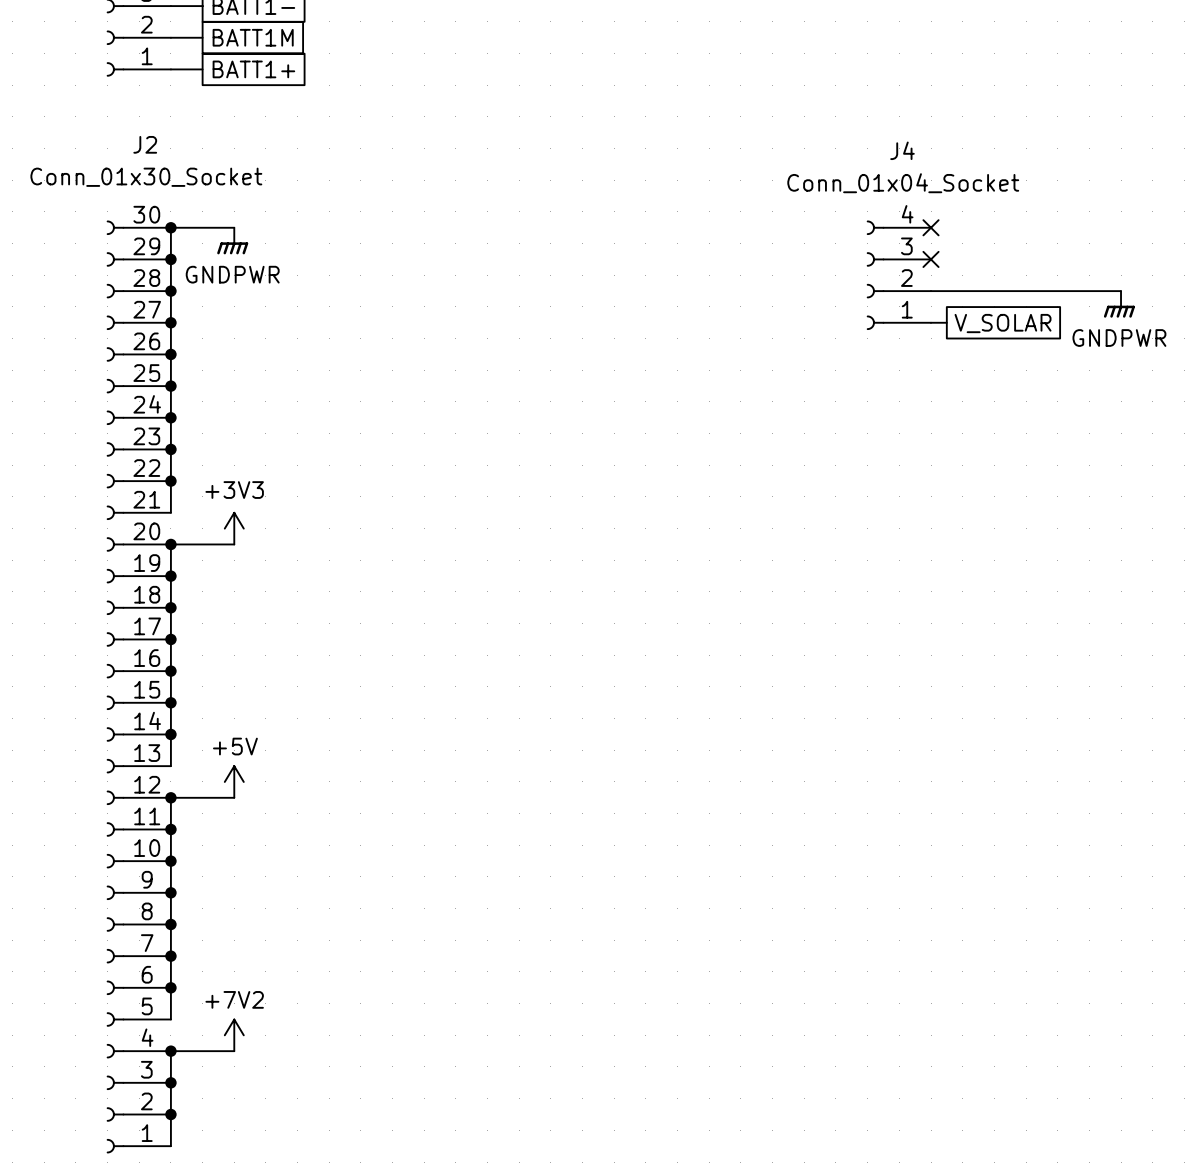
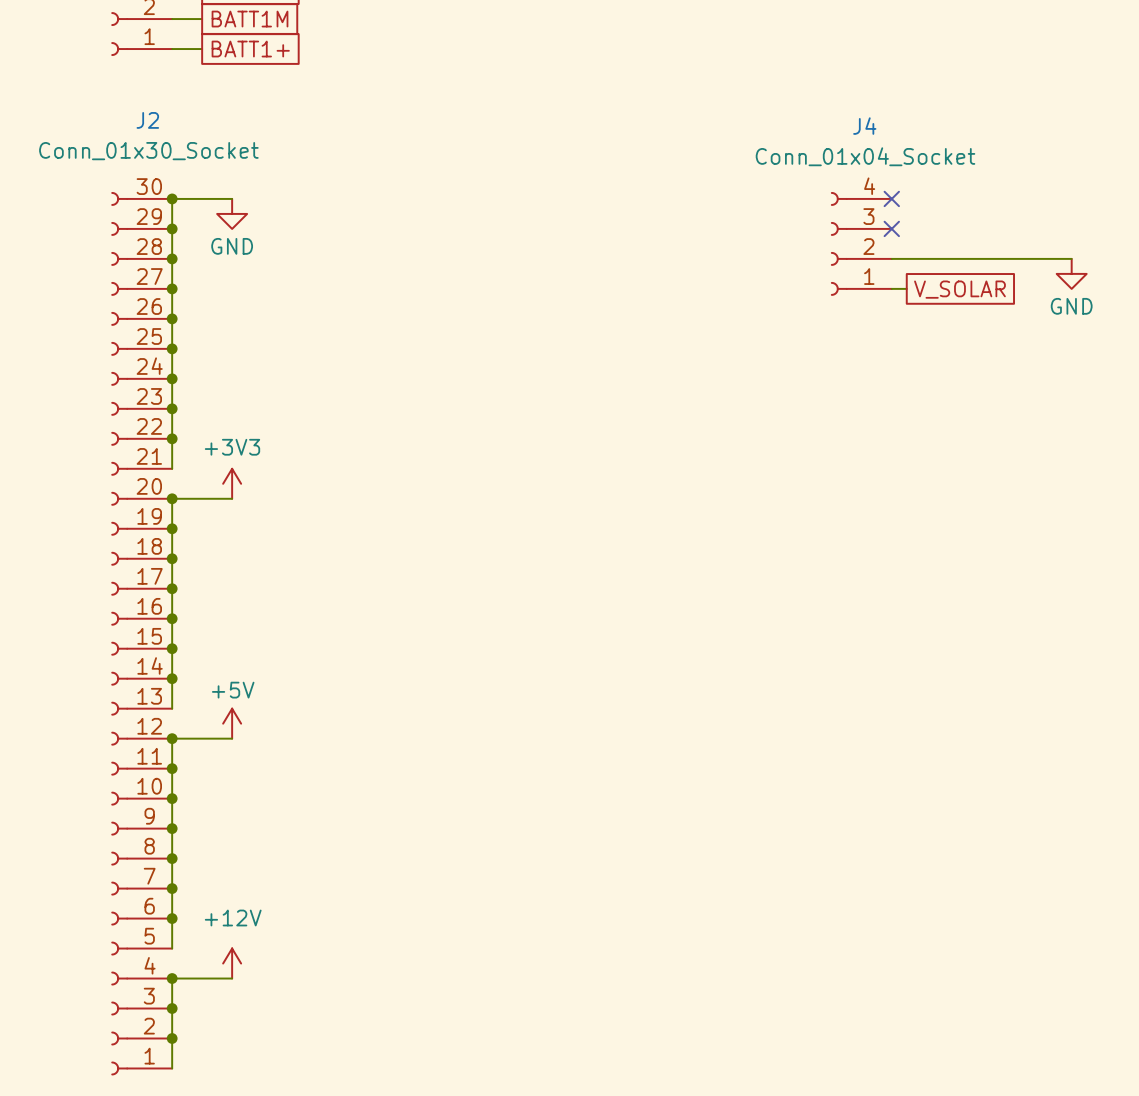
power symbol: GNDPWR (232, 241) -> GND (232, 213)
power symbol: GNDPWR (1119, 304) -> GND (1071, 273)
power symbol: +7V2 (234, 1035) -> +12V (232, 963)

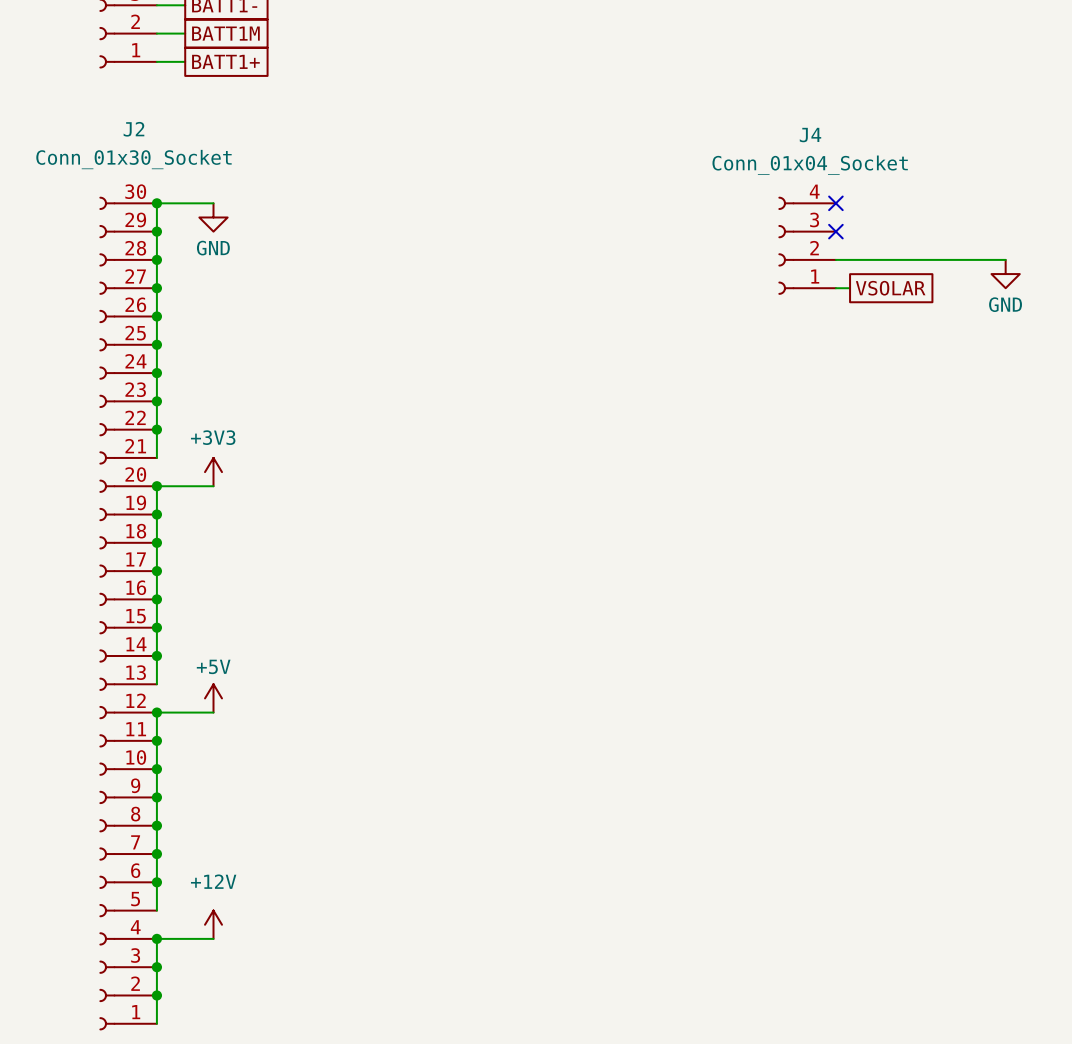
global label: V_SOLAR (959, 289) -> VSOLAR (890, 288)

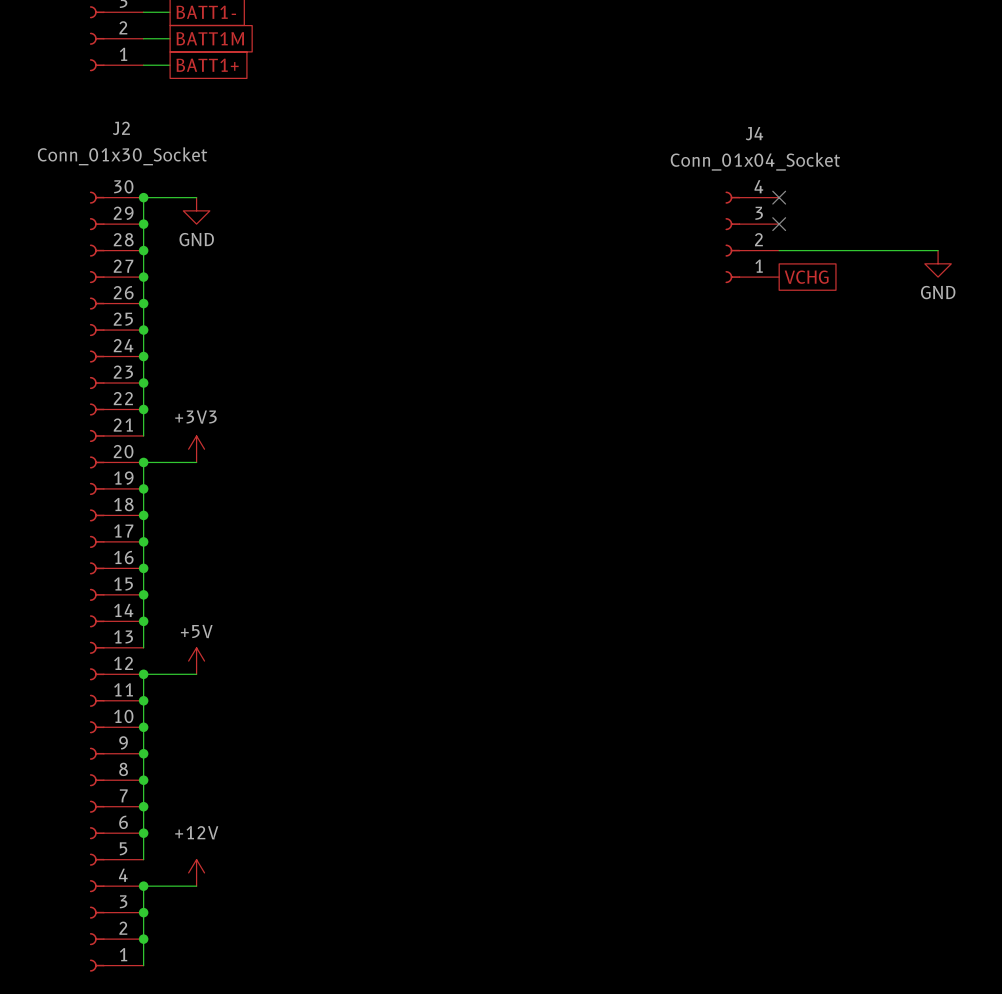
wire: (835, 288) (850, 288) -> none
global label: none -> VCHG (806, 277)
global label: VSOLAR (890, 288) -> none

